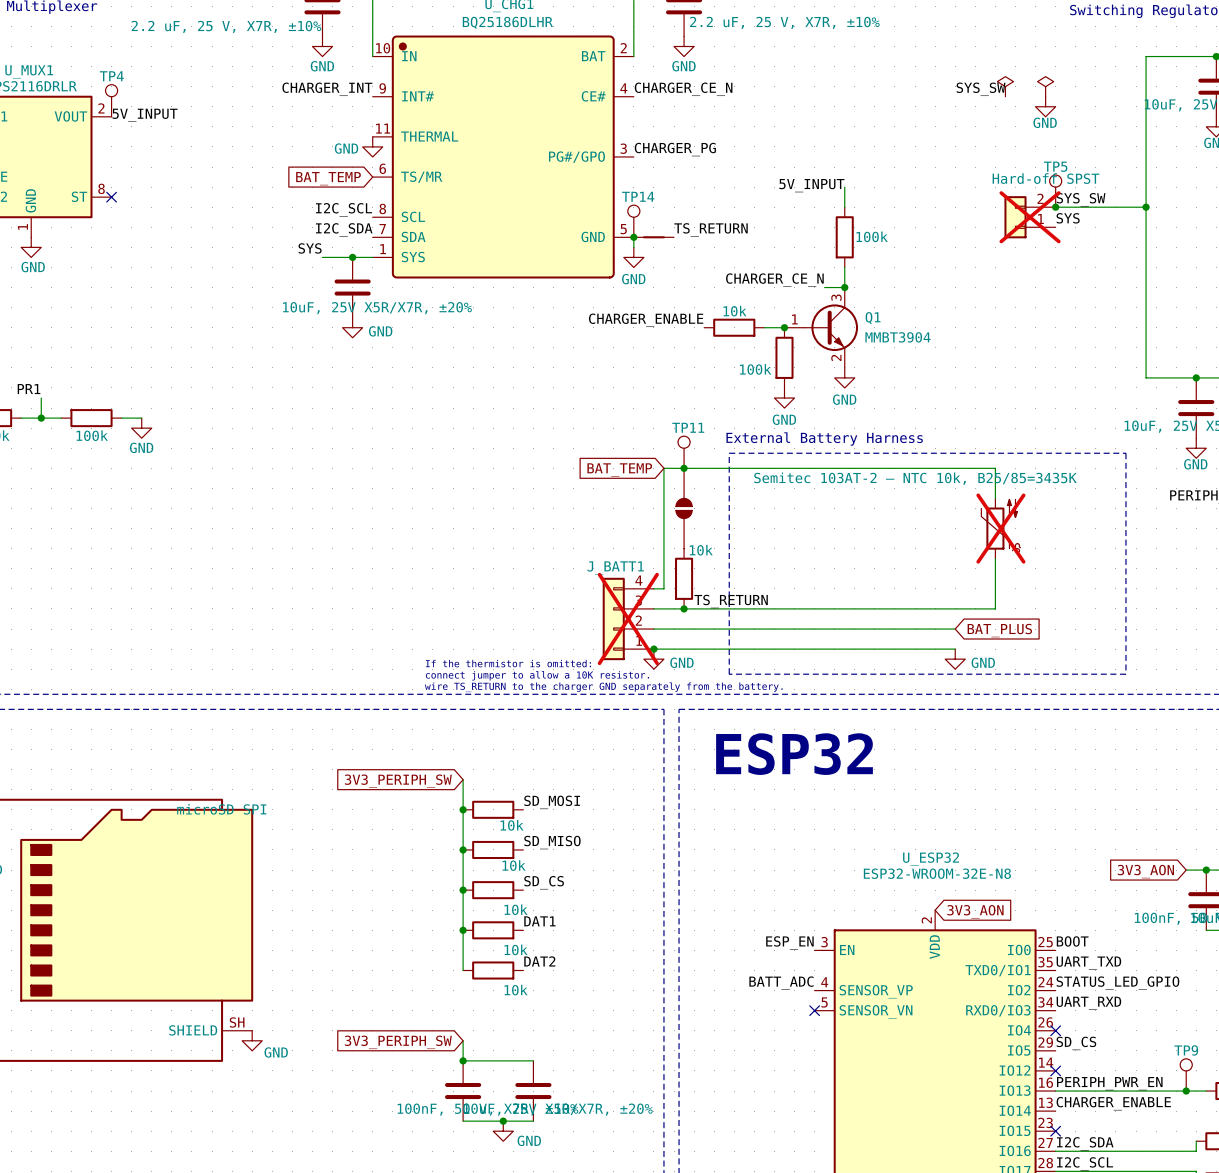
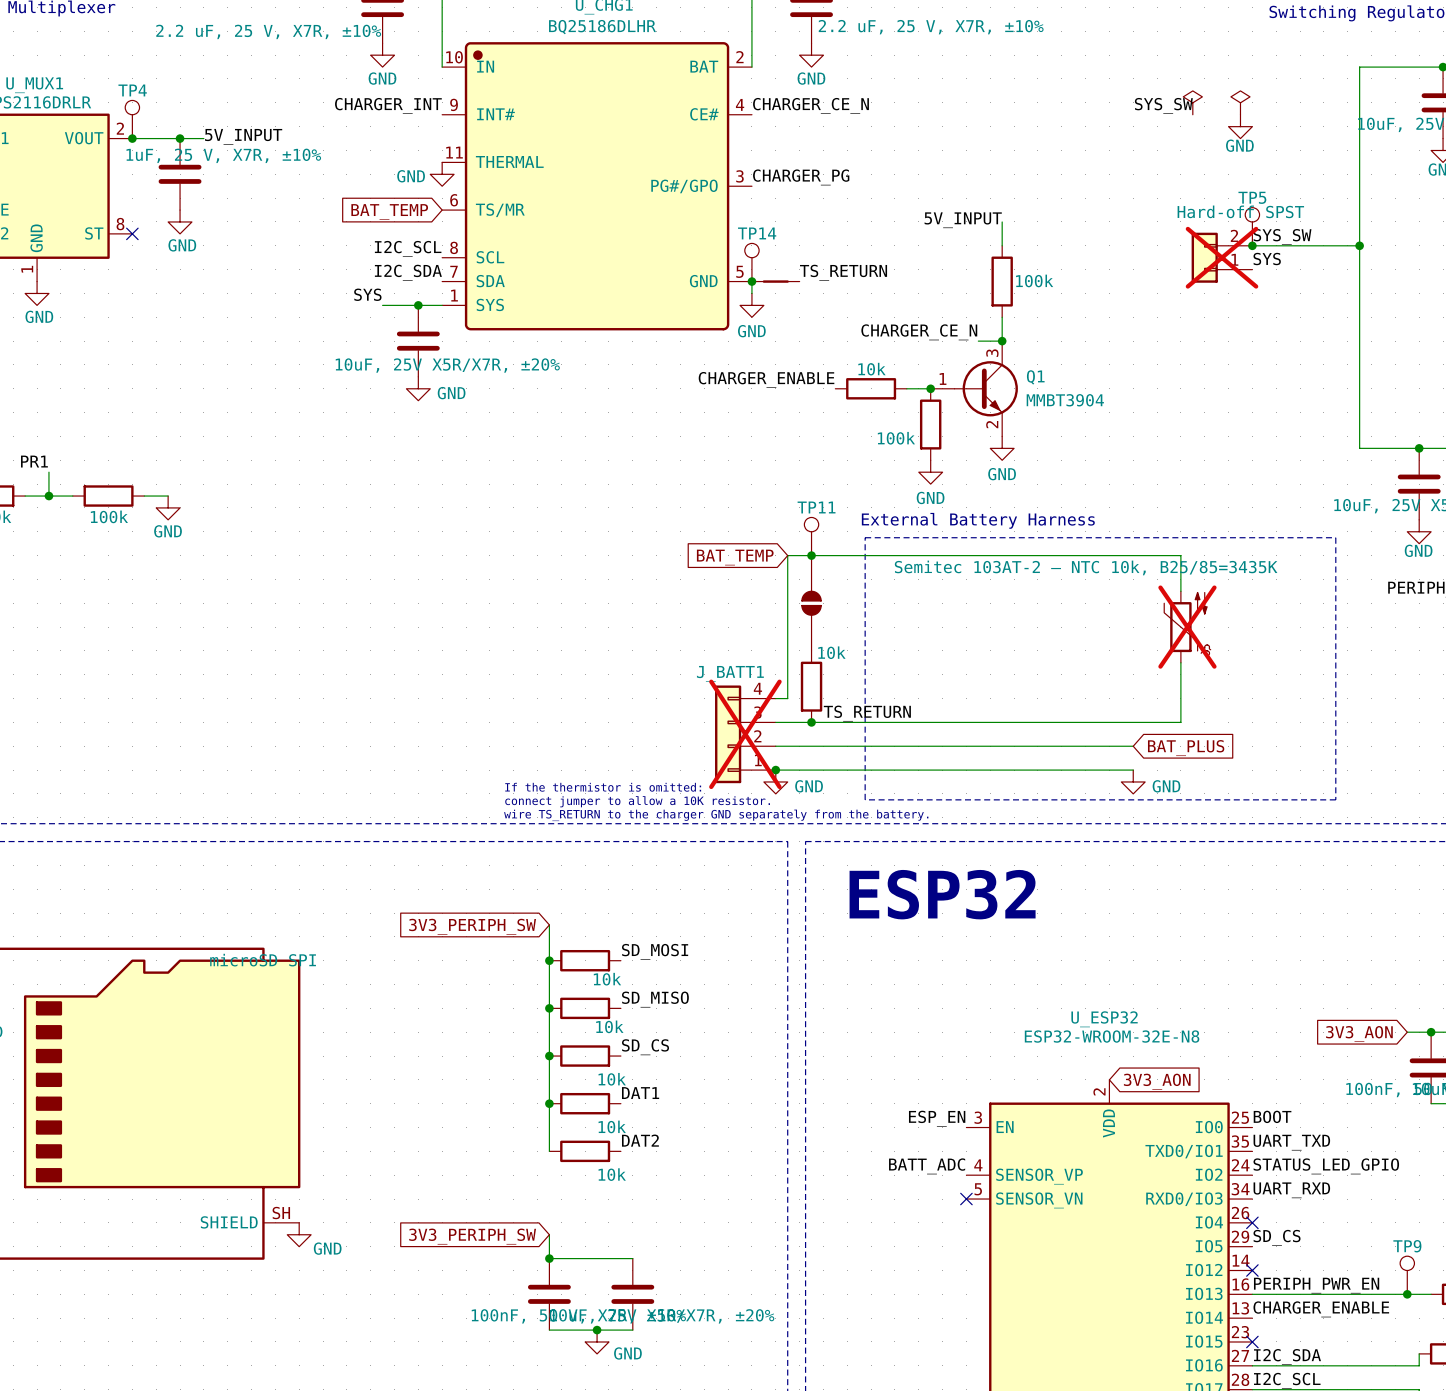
label position: 5V_INPUT (145, 115) -> 5V_INPUT (243, 136)
wire: none -> (132, 138) (203, 138)
junction: none -> (132, 138)
junction: none -> (180, 138)
part: none -> 1uF, 25 V, X7R, ±10% (180, 174)
power symbol: none -> GND (180, 221)

